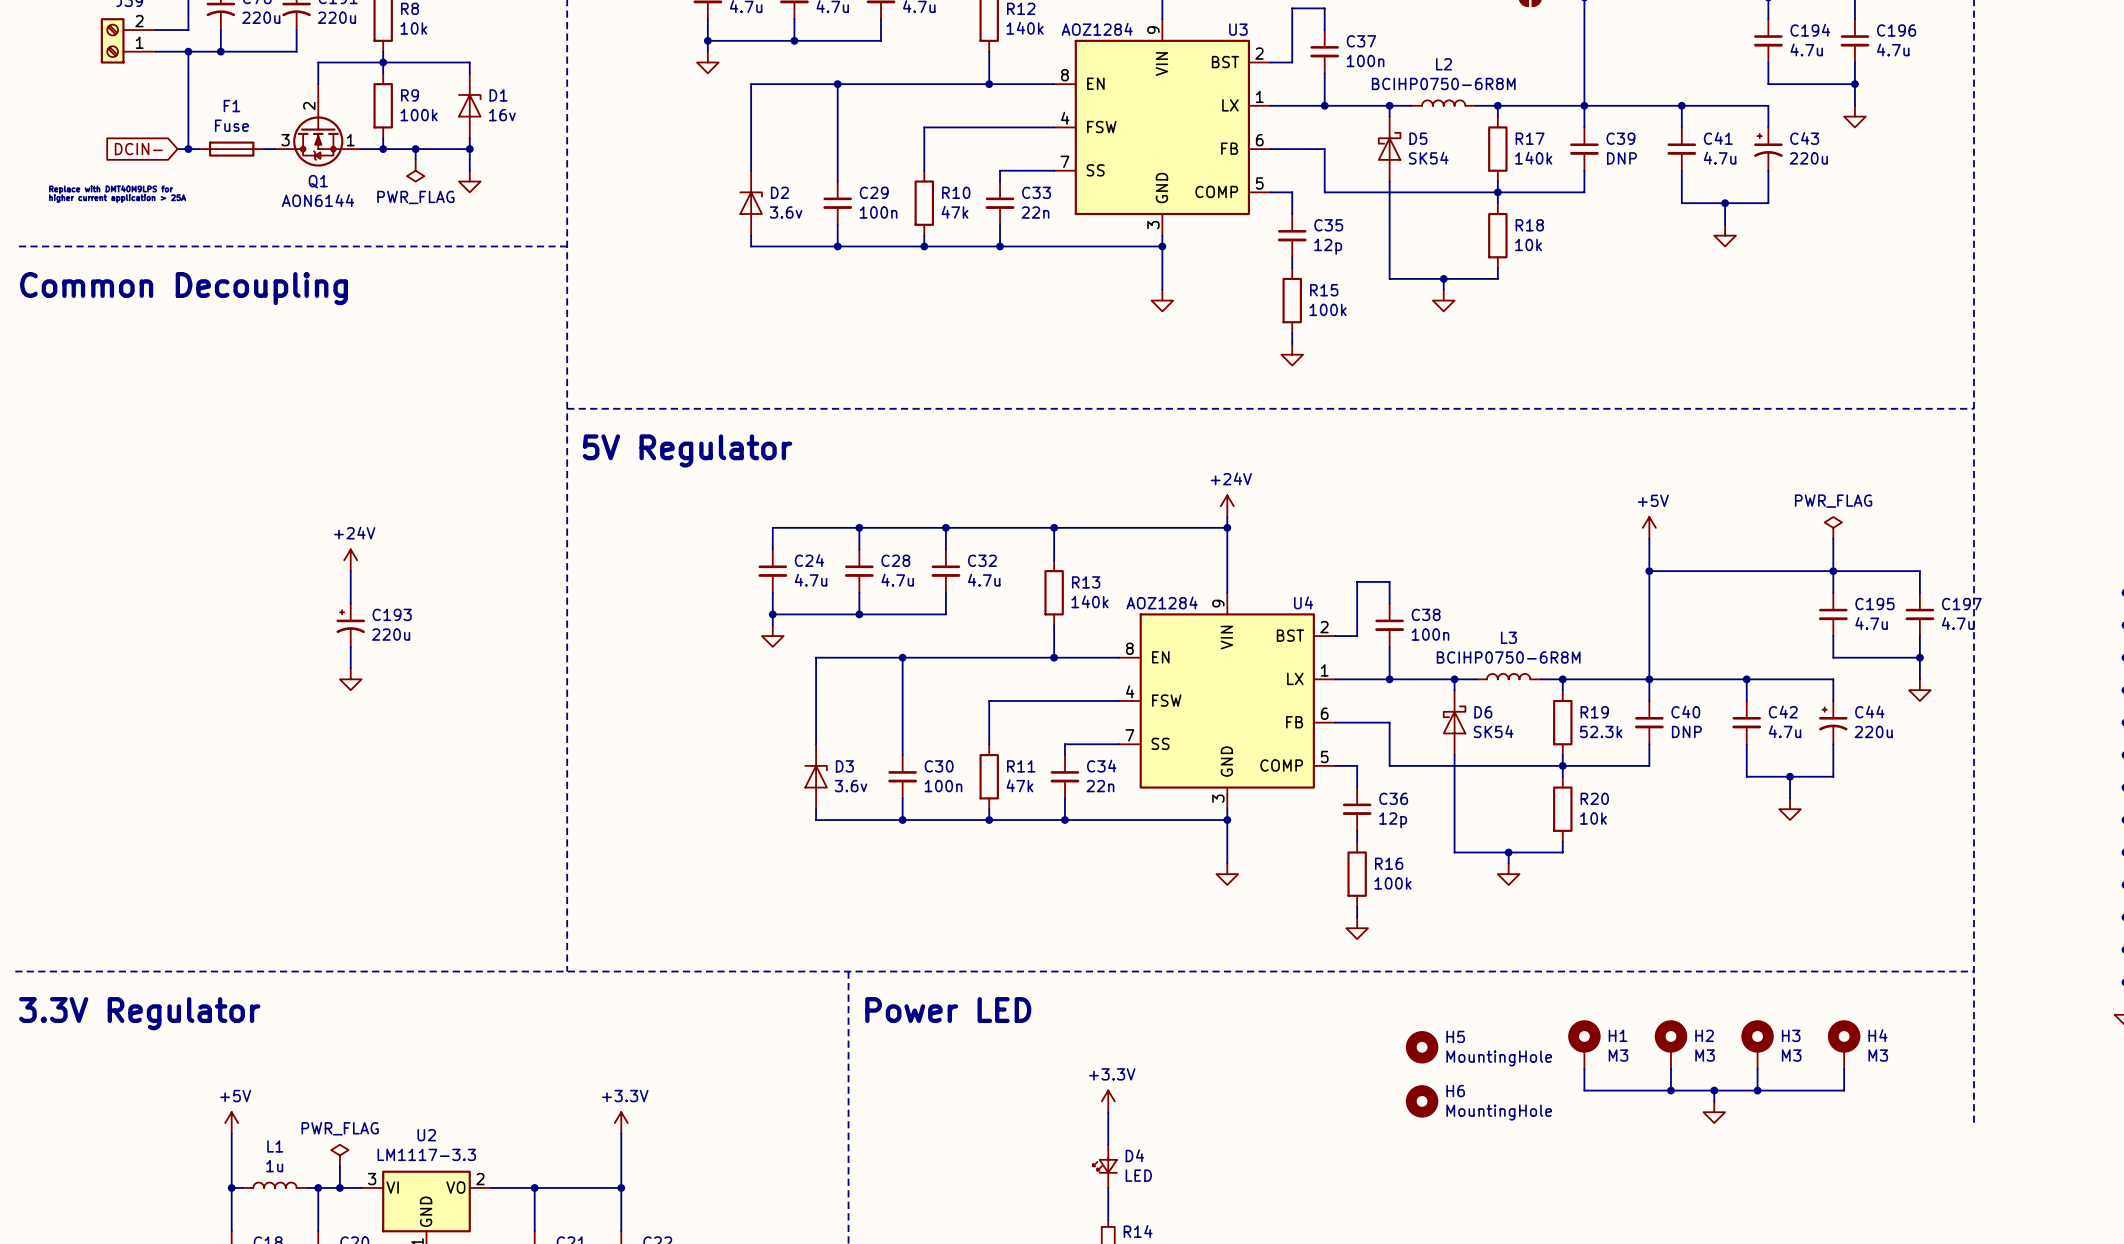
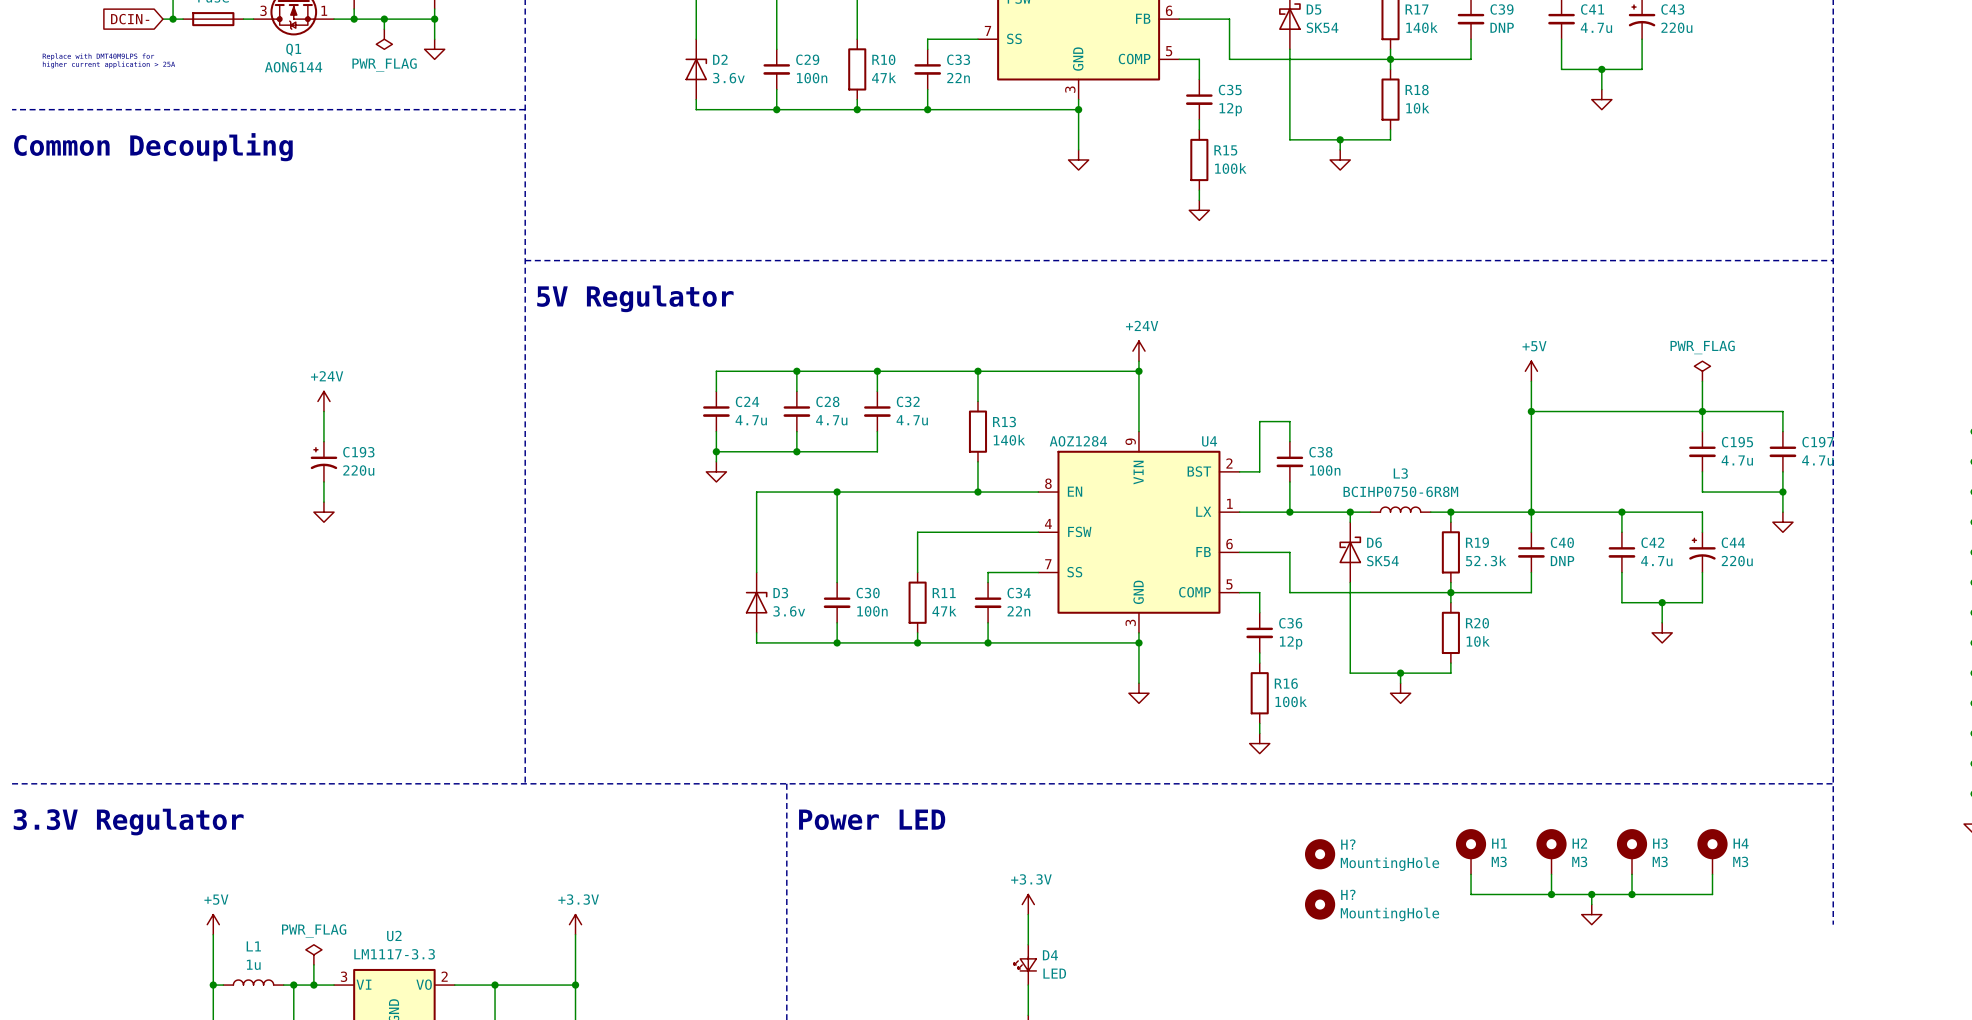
H5 name: H5 (1455, 1036) -> H? (1348, 844)
H6 name: H6 (1455, 1091) -> H? (1348, 894)

